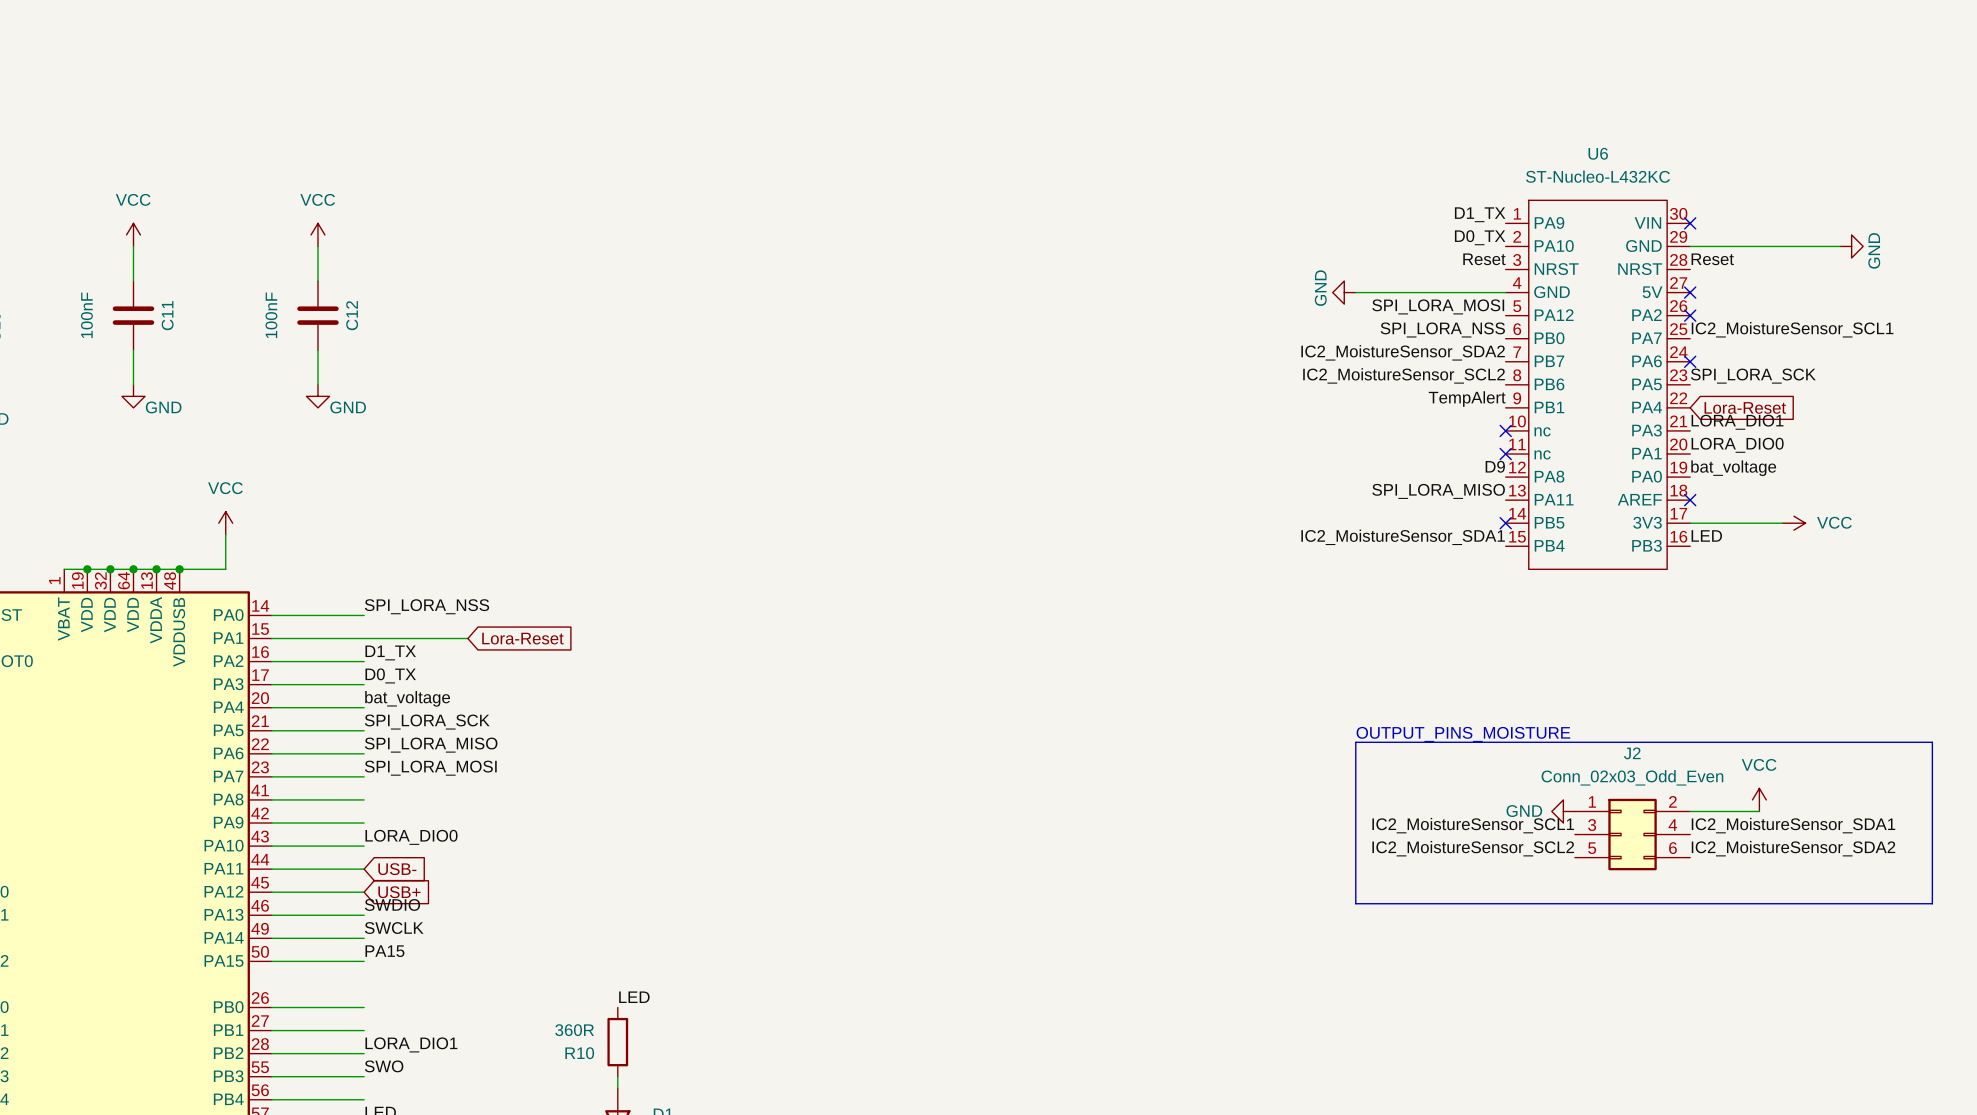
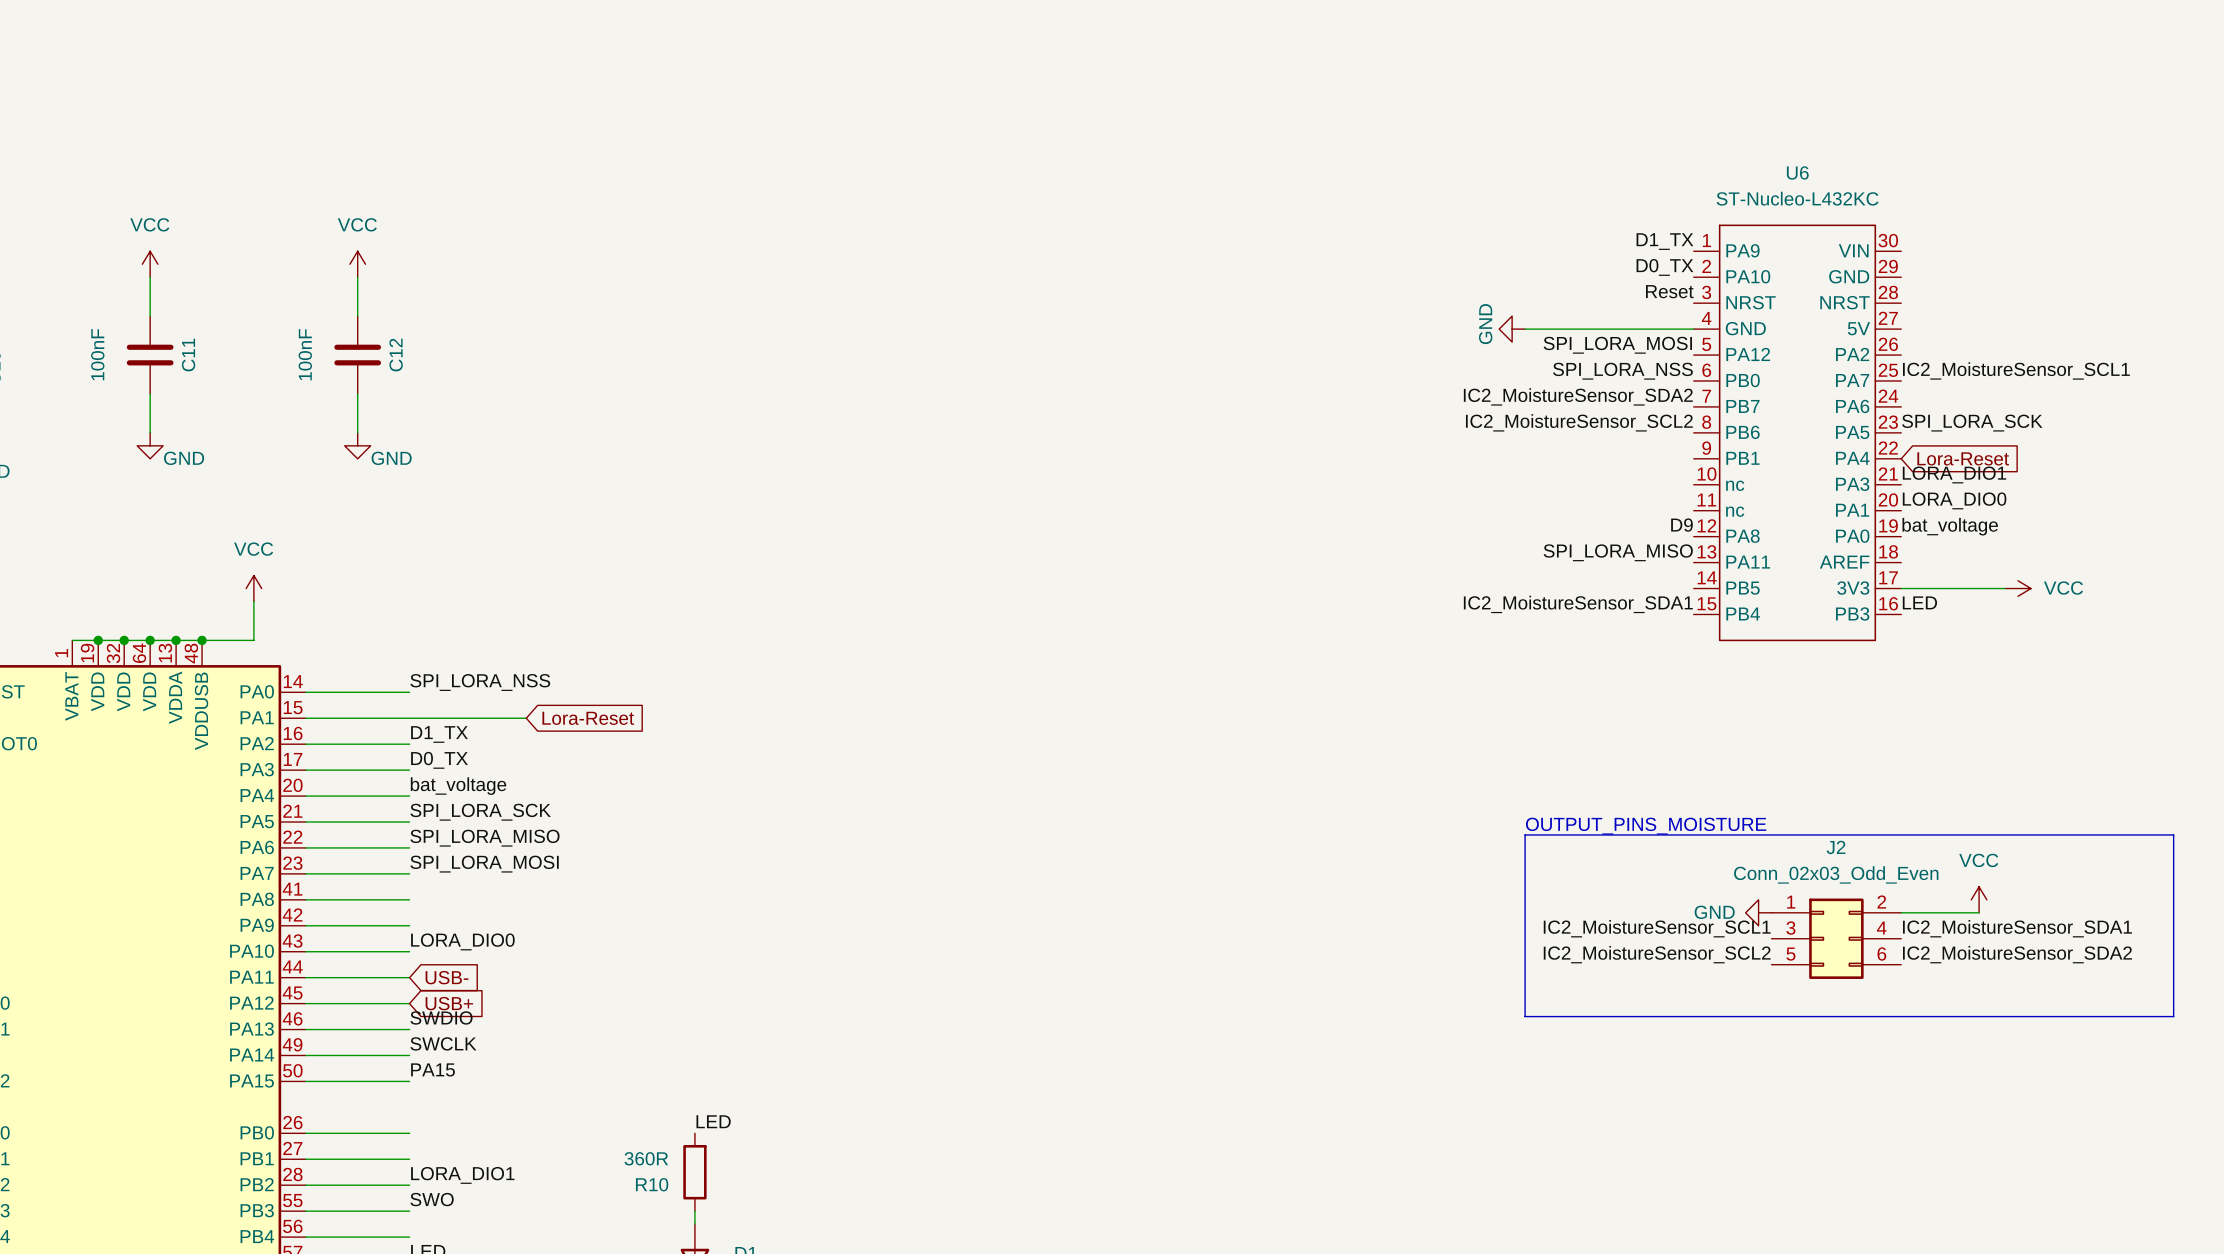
no-connect mark: (1690, 223) -> none
wire: (1690, 246) (1840, 246) -> none
power symbol: GND (1851, 246) -> none
label: Reset (1712, 259) -> none
no-connect mark: (1690, 292) -> none
no-connect mark: (1690, 315) -> none
no-connect mark: (1690, 361) -> none
label: TempAlert (1467, 399) -> none
no-connect mark: (1505, 430) -> none
no-connect mark: (1505, 454) -> none
no-connect mark: (1690, 500) -> none
no-connect mark: (1505, 523) -> none

